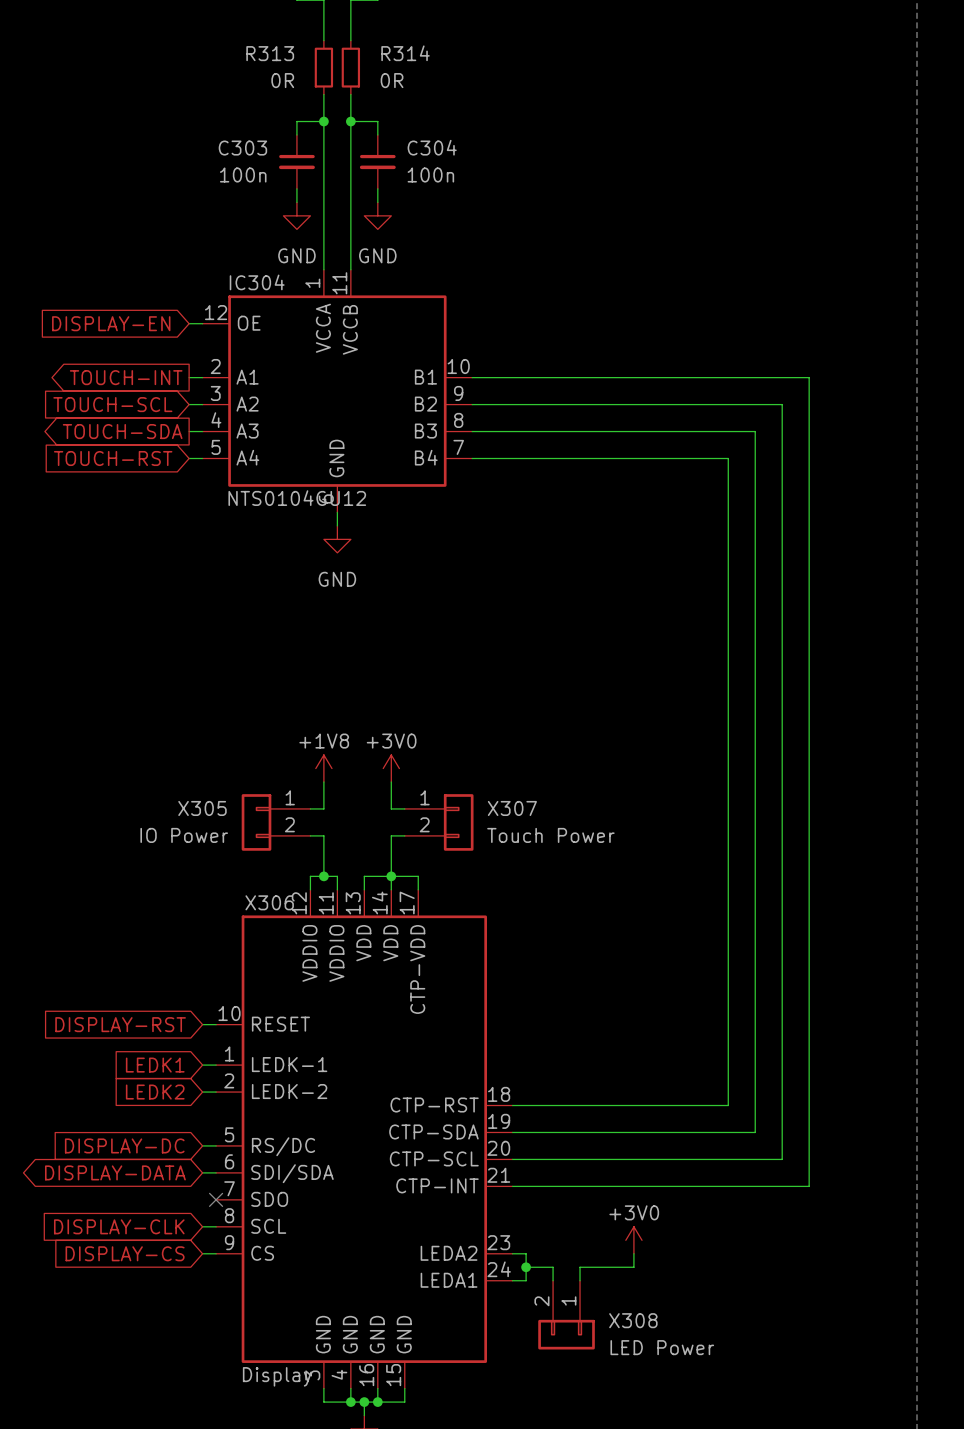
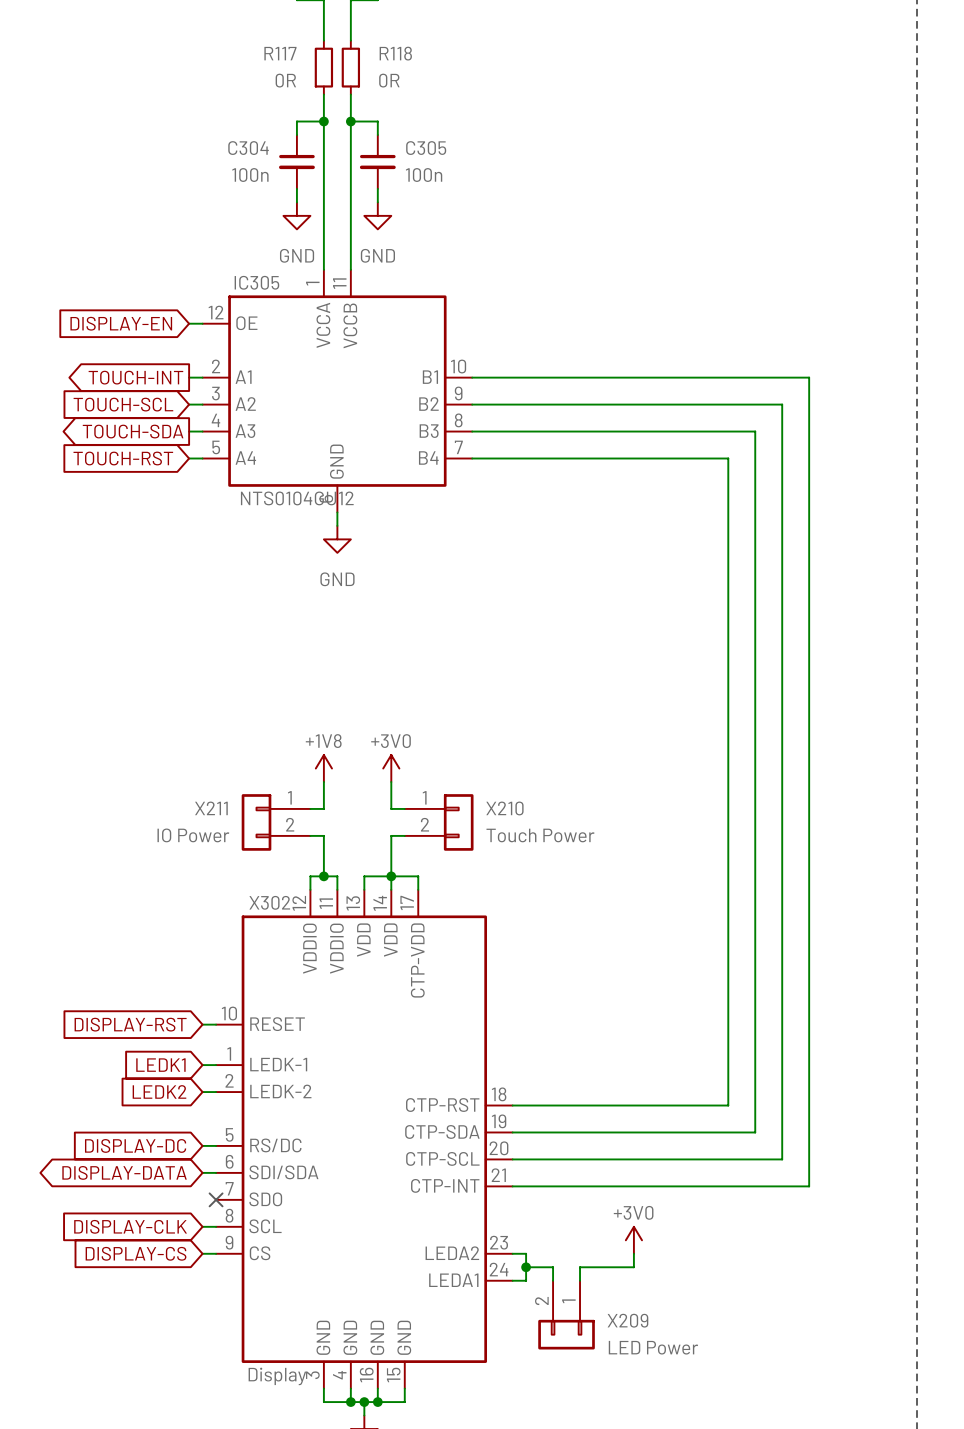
R313 name: R313 (270, 53) -> R117 (280, 53)
R314 name: R314 (405, 53) -> R118 (395, 53)
C304 name: C304 (432, 147) -> C305 (426, 148)
C303 name: C303 (242, 148) -> C304 (248, 148)
IC304 name: IC304 (257, 282) -> IC305 (256, 282)
X305 name: X305 (202, 808) -> X211 (211, 808)
X307 name: X307 (512, 808) -> X210 (504, 808)
X306 name: X306 (269, 902) -> X302 (269, 902)
X308 name: X308 (633, 1320) -> X209 (627, 1320)

